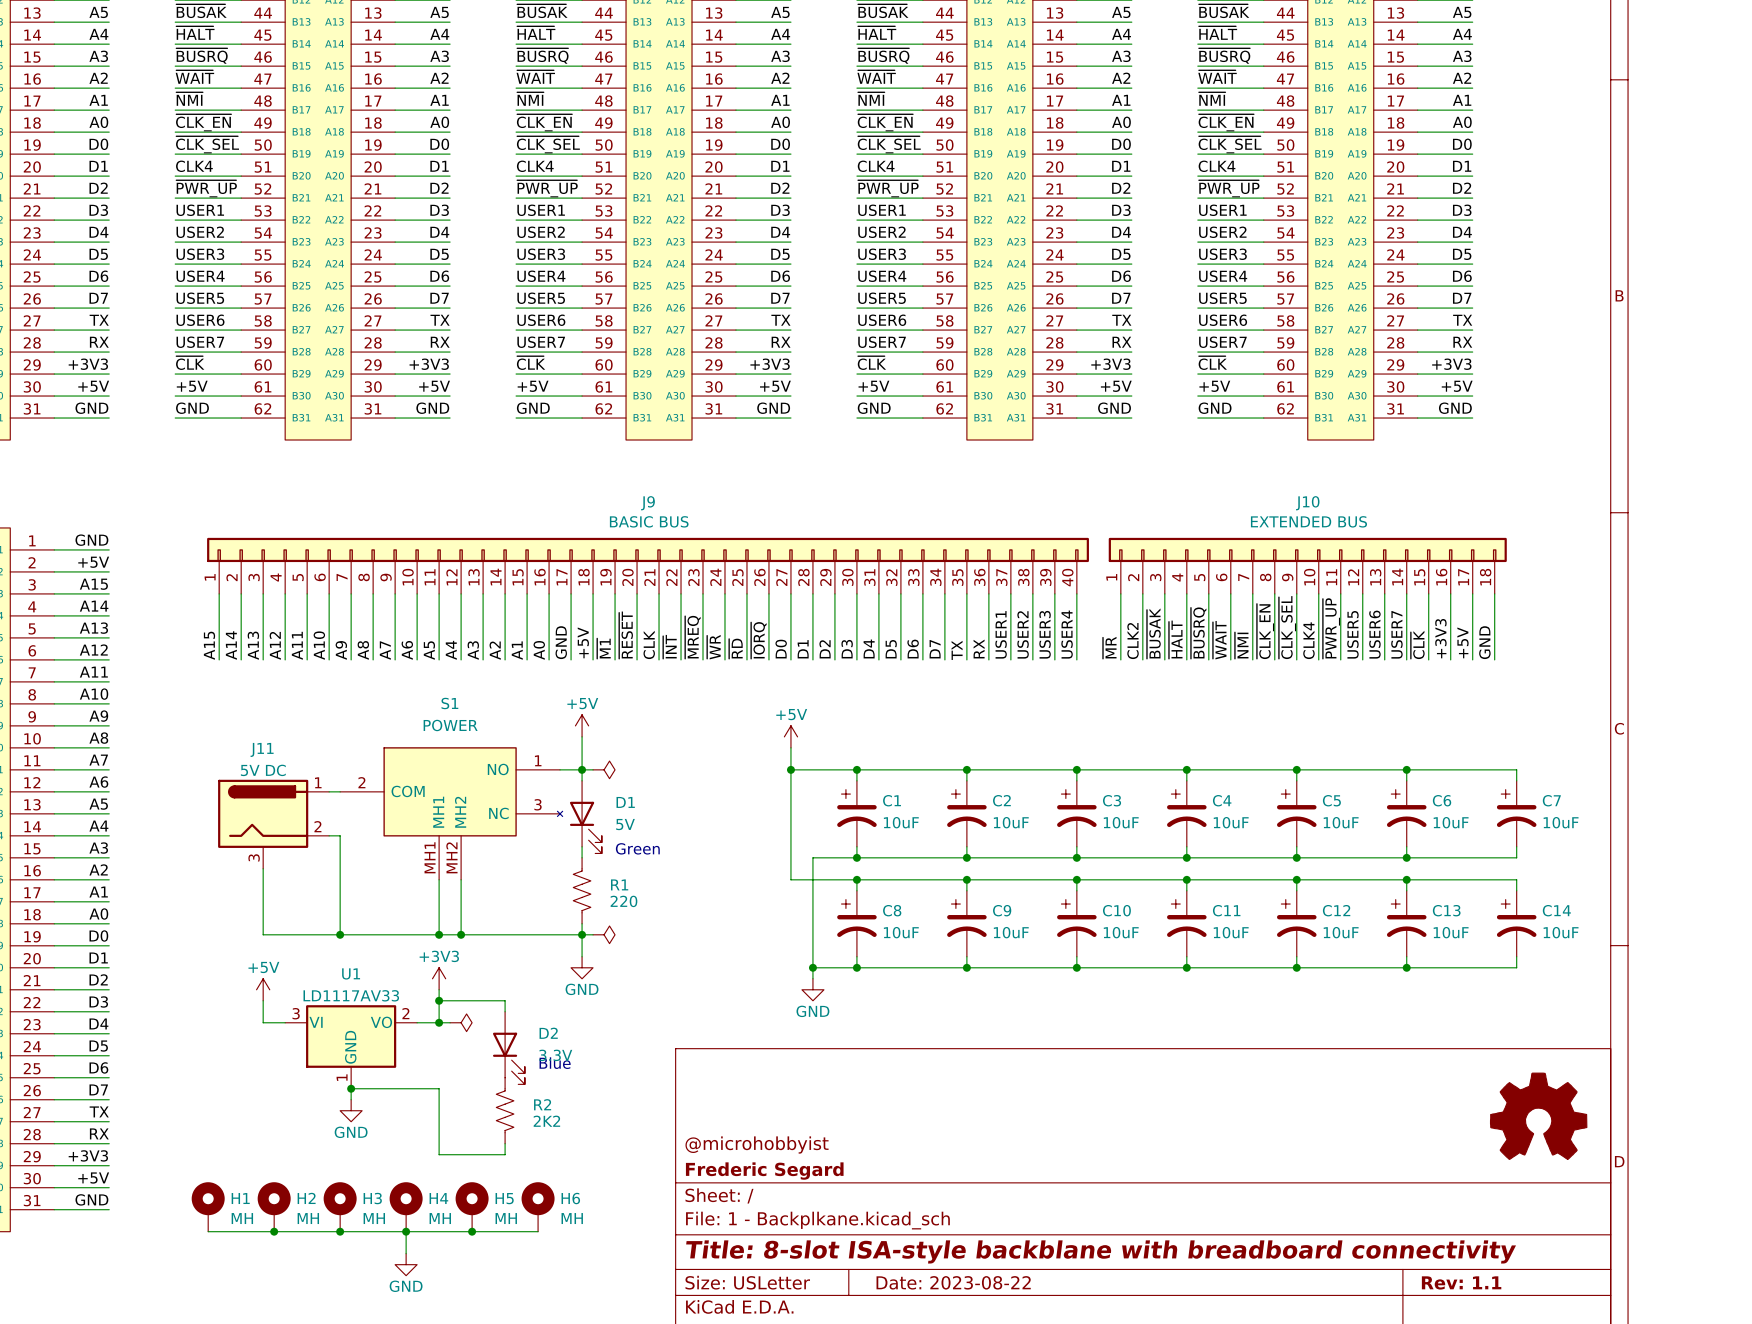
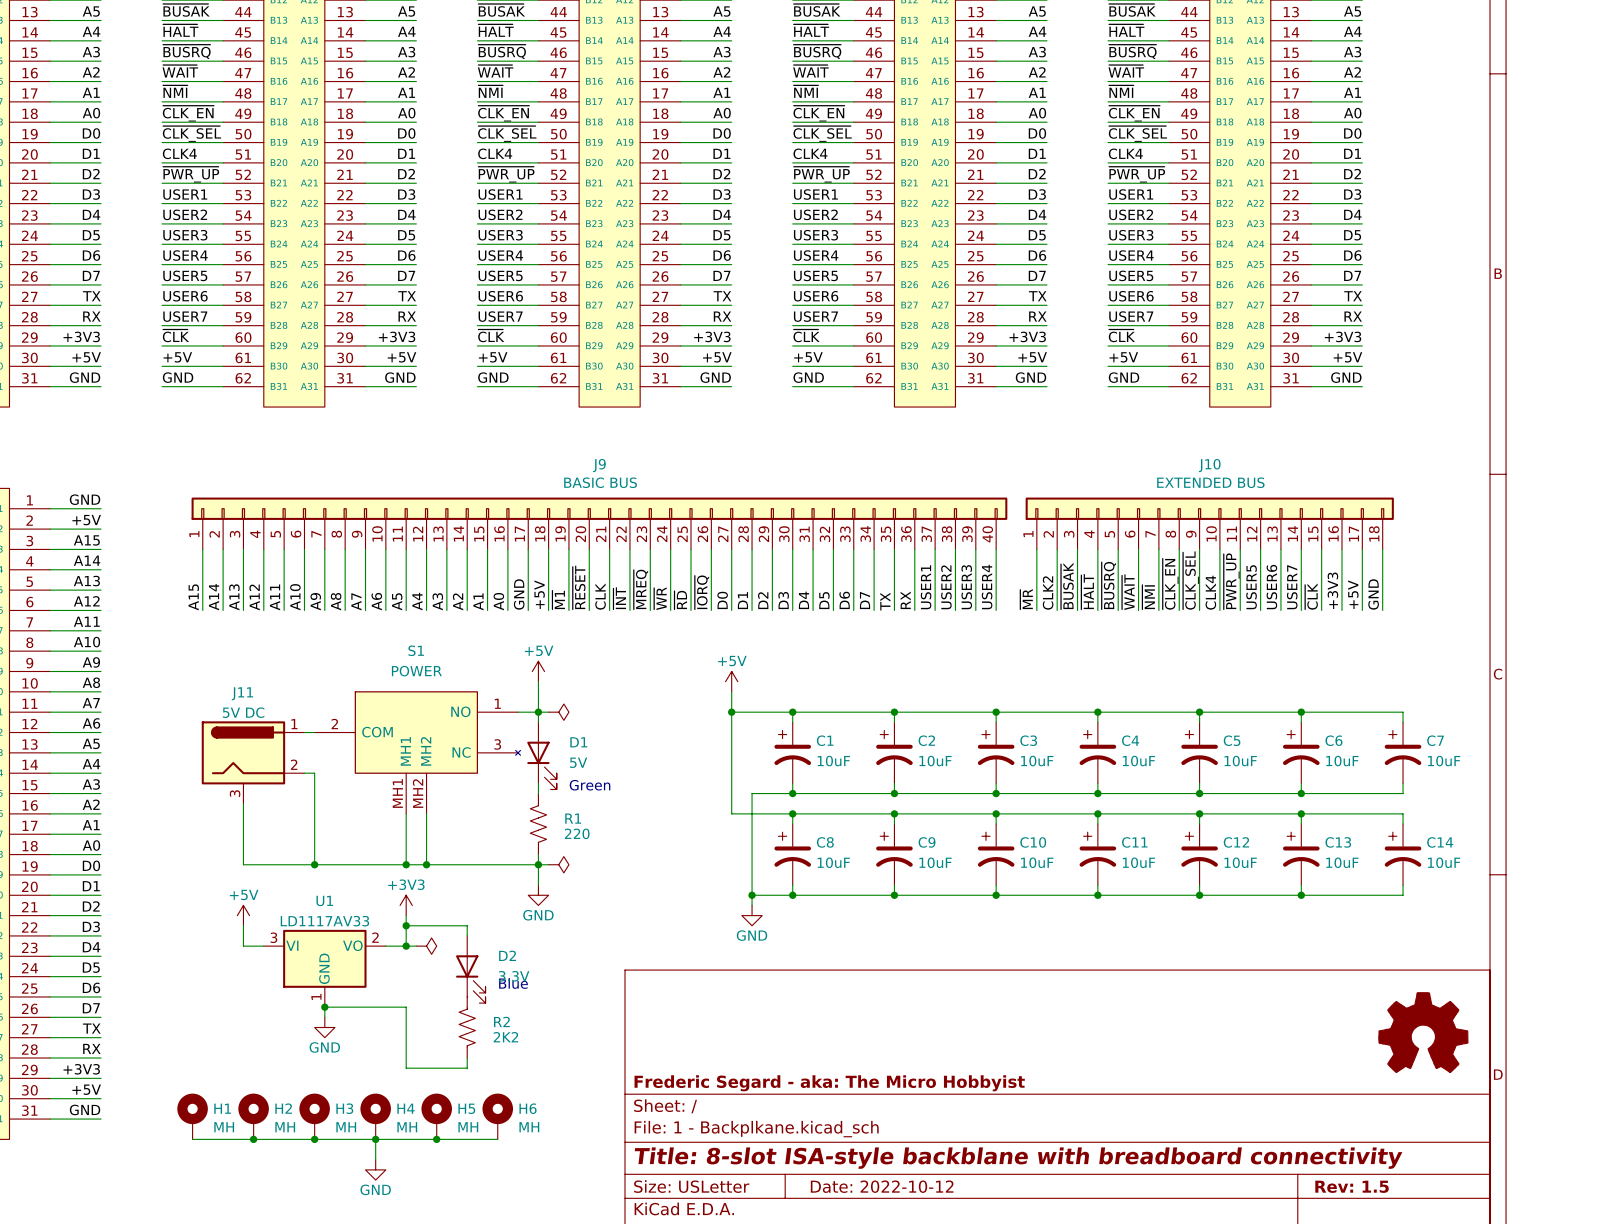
title block: @microhobbyist (757, 1144) -> none
title block: Frederic Segard (764, 1171) -> Frederic Segard - aka: The Micro Hobbyist (829, 1083)
title block: Date: 2023-08-22 (953, 1282) -> Date: 2022-10-12 (882, 1186)
title block: Rev: 1.1 (1461, 1282) -> Rev: 1.5 (1352, 1186)

